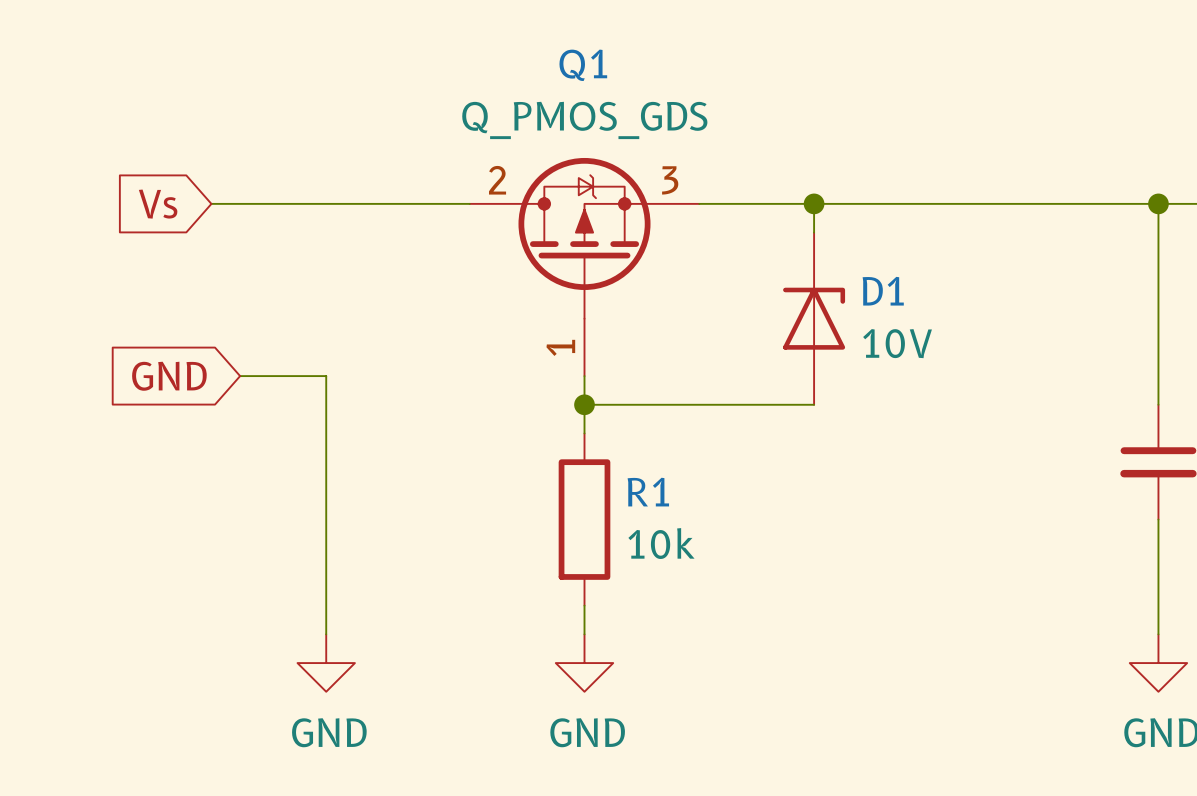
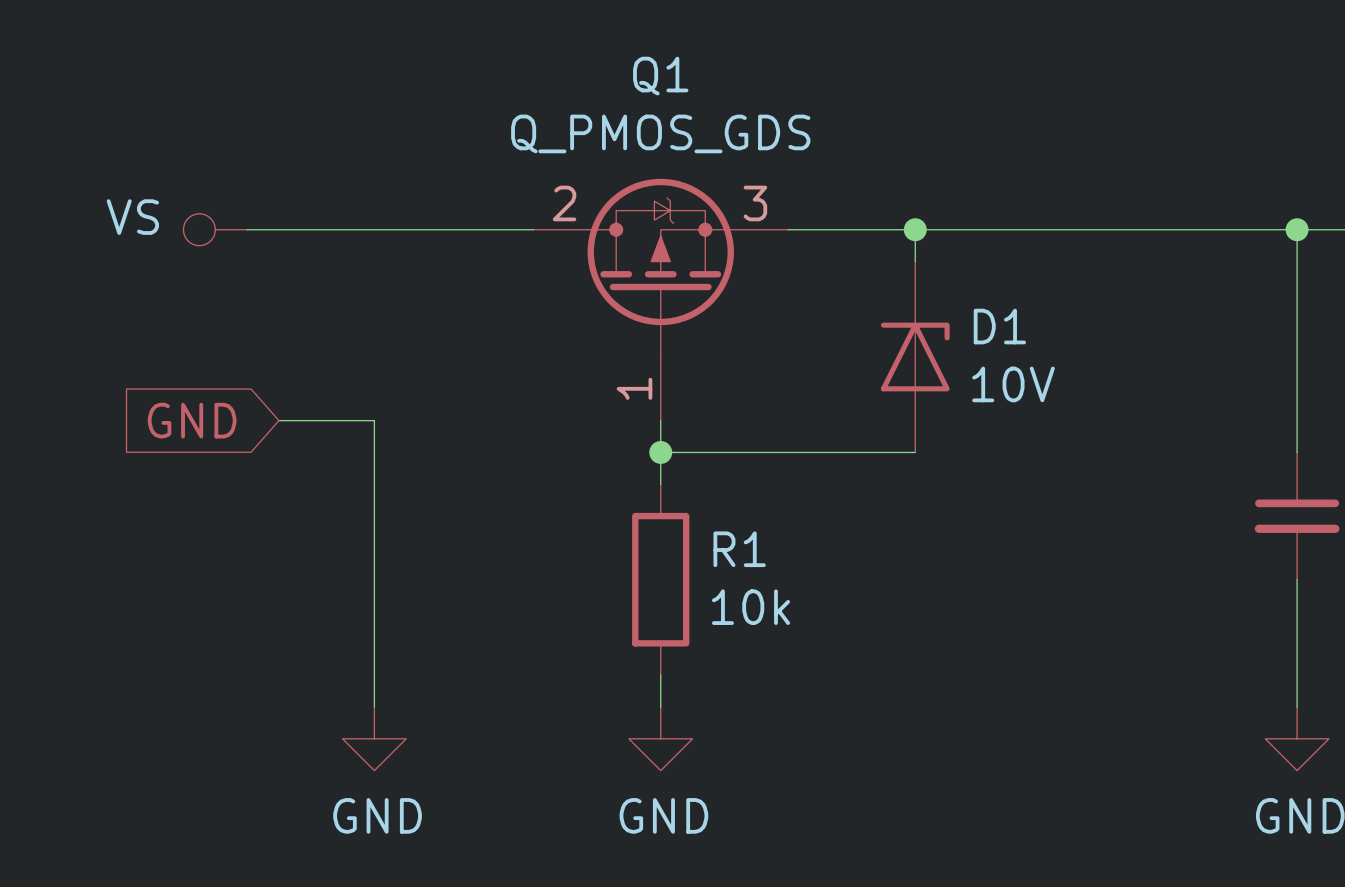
power symbol: none -> VS (215, 229)
global label: Vs (158, 204) -> none

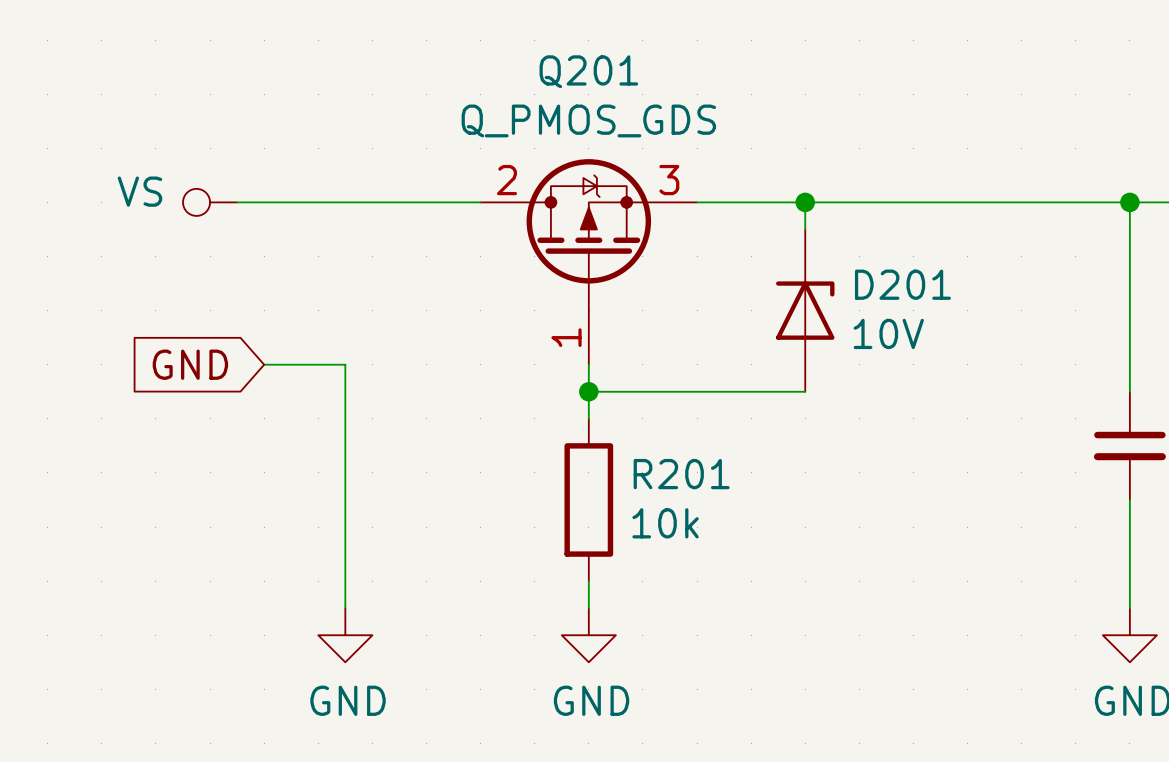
Q1 name: Q1 (660, 76) -> Q201 (588, 71)
D1 name: D1 (999, 326) -> D201 (902, 284)
R1 name: R1 (739, 549) -> R201 (681, 474)

